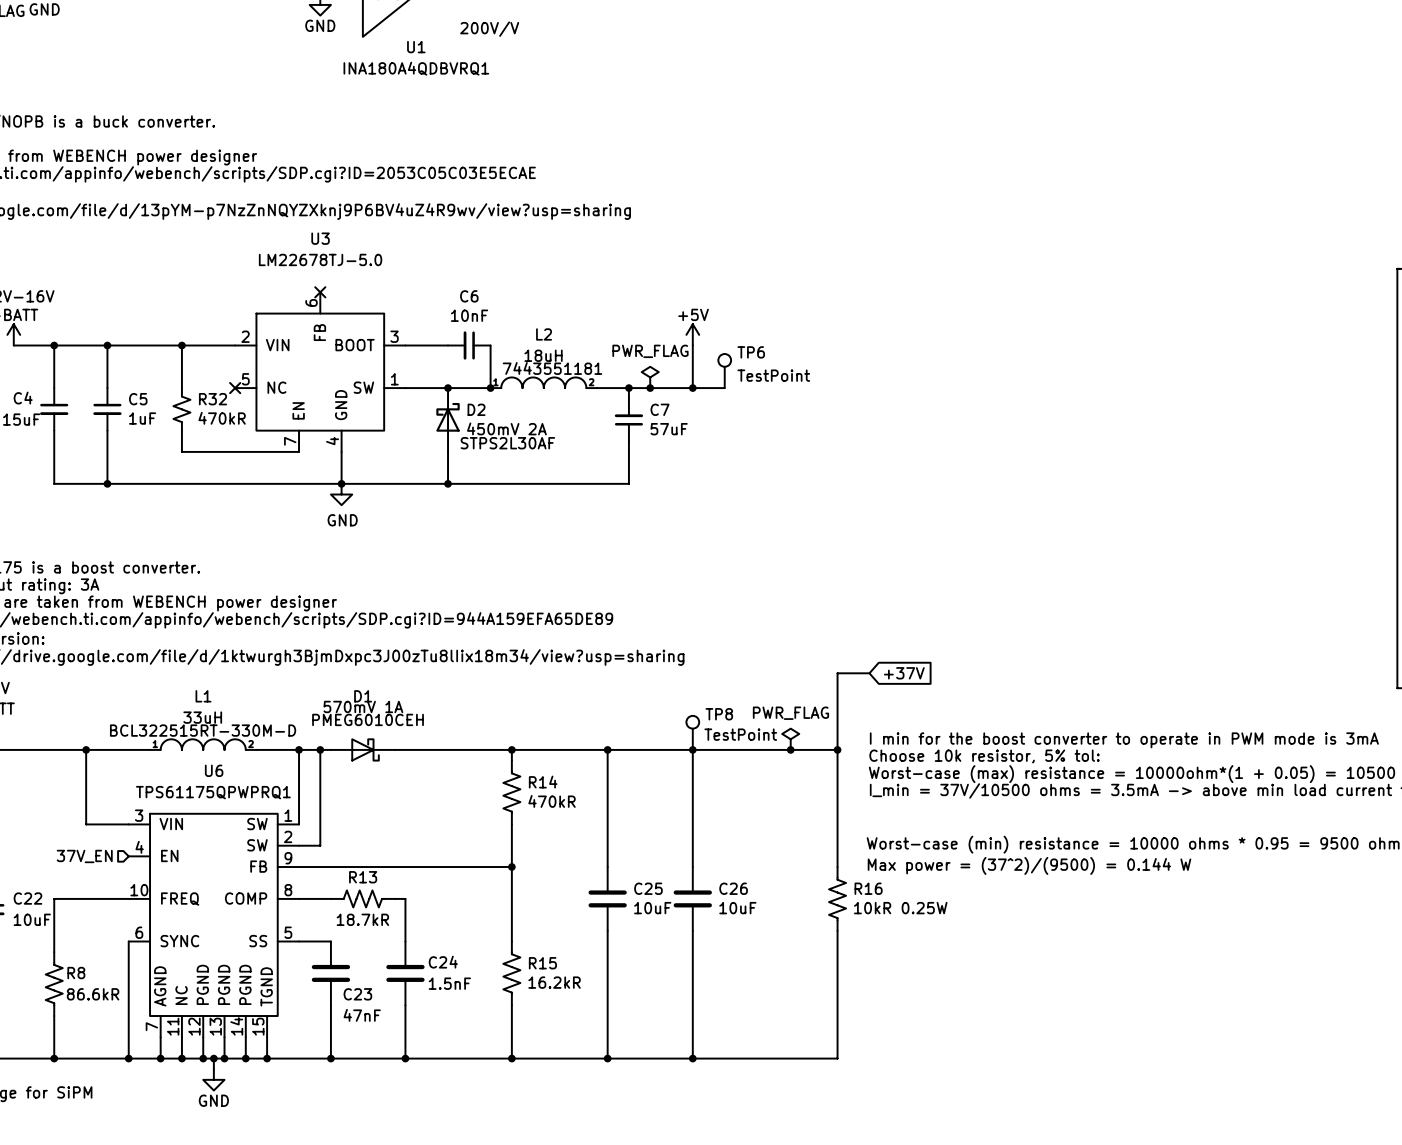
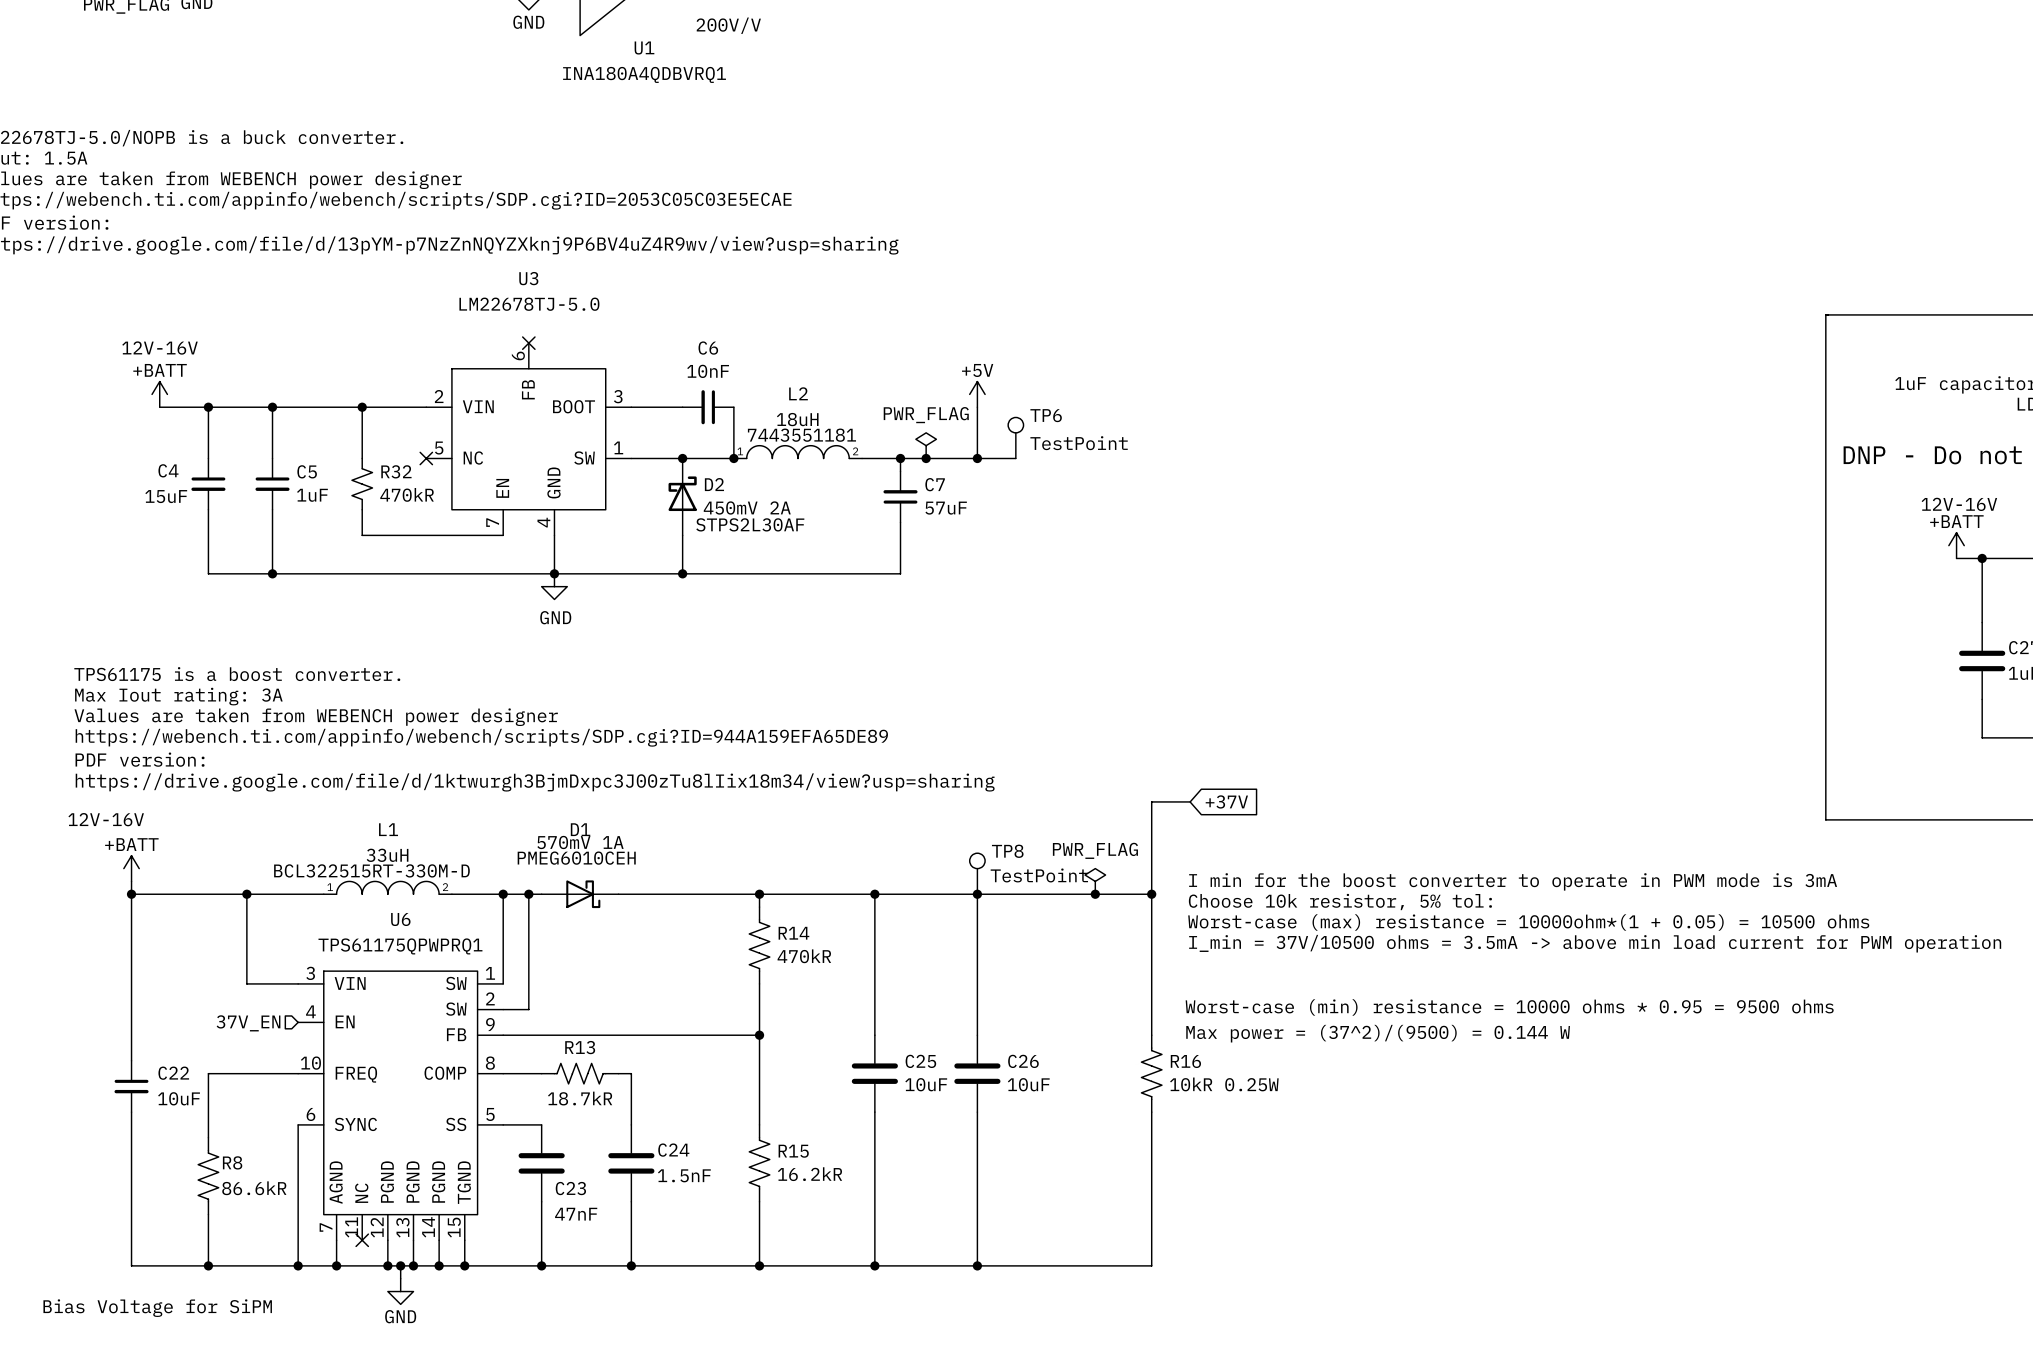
wire: (181, 1037) (181, 1058) -> none
no-connect mark: none -> (362, 1240)
junction: (181, 1058) -> none

